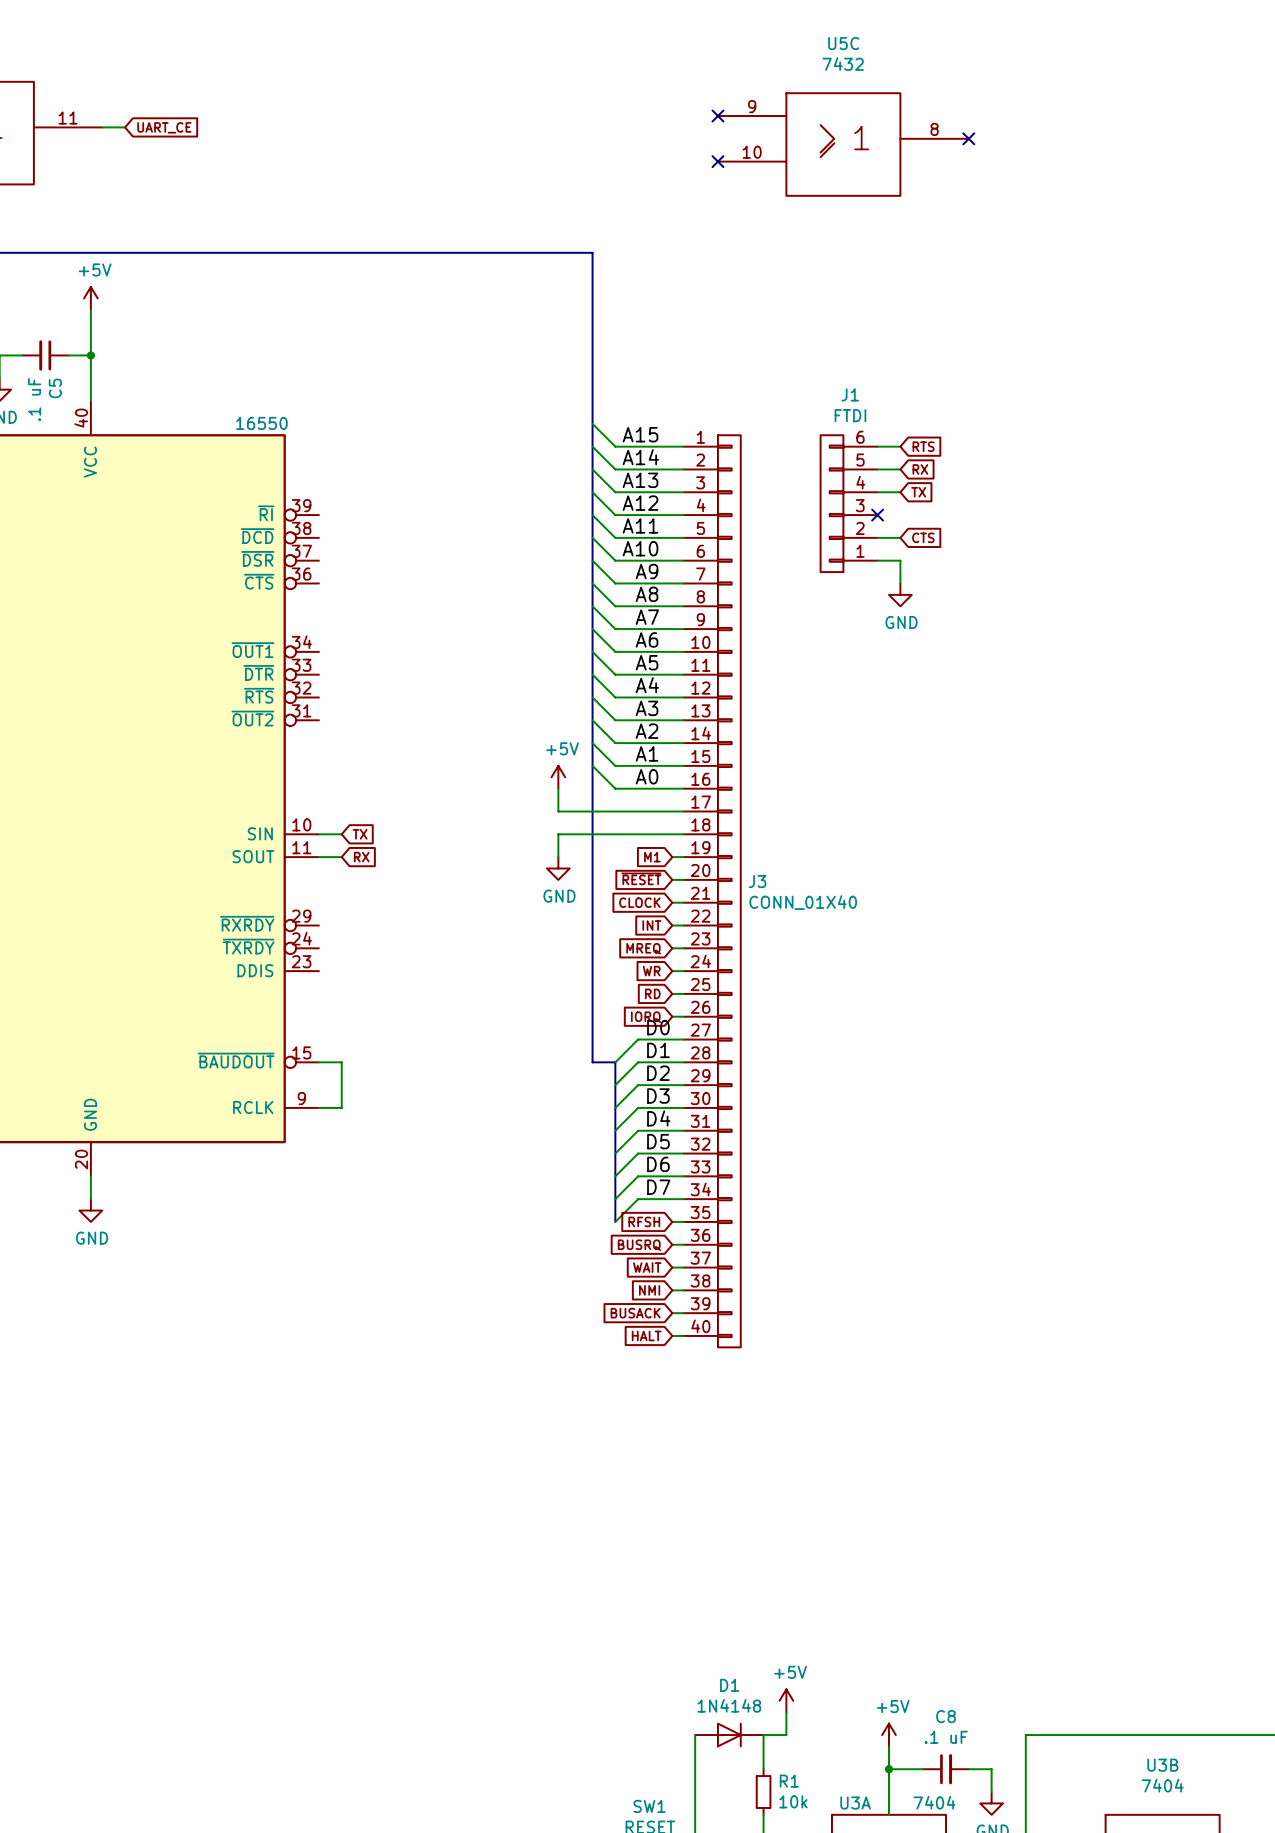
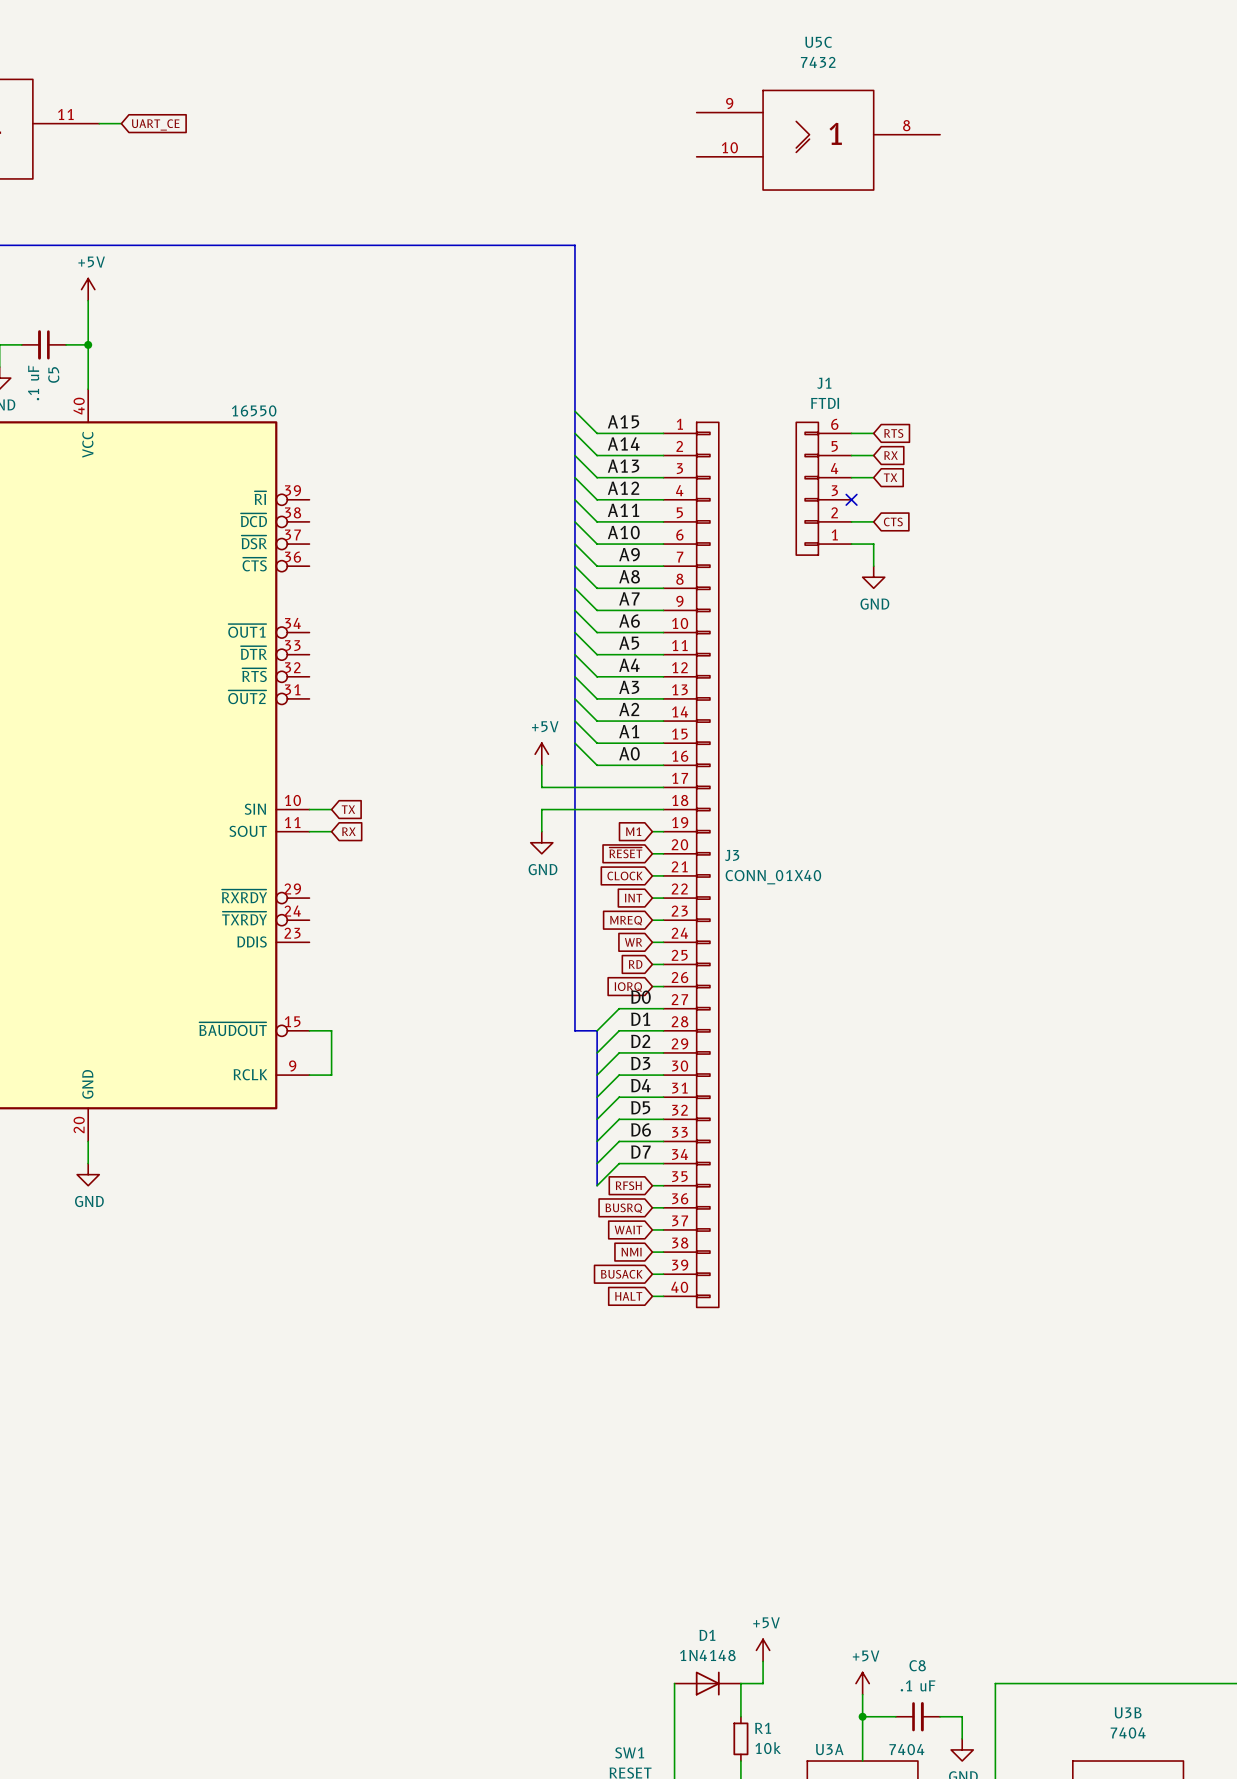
no-connect mark: (717, 116) -> none
no-connect mark: (968, 138) -> none
no-connect mark: (717, 161) -> none

